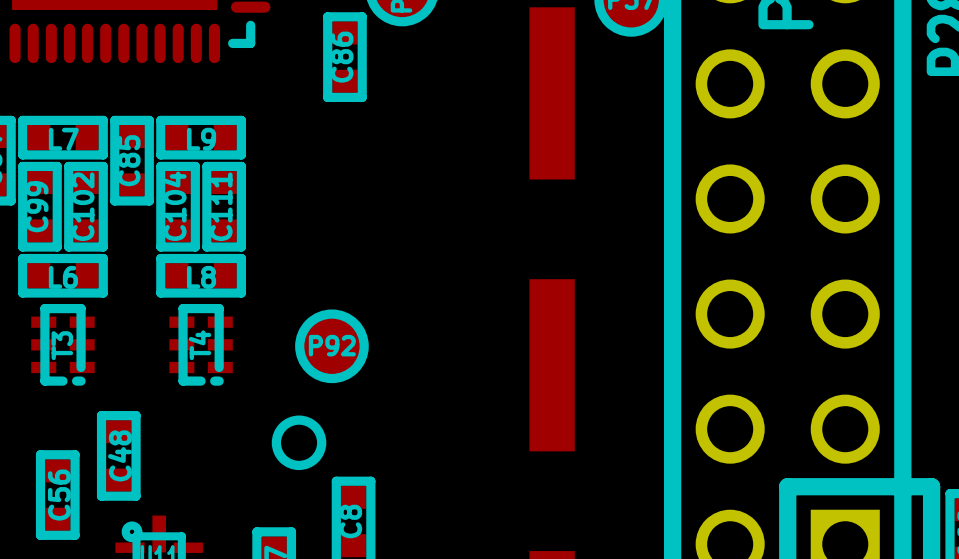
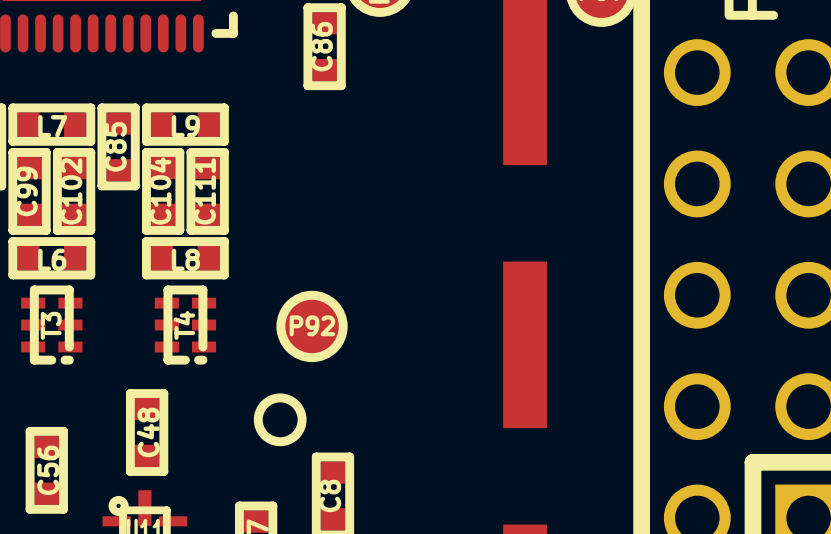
C48 position: (118, 455) -> (147, 432)

